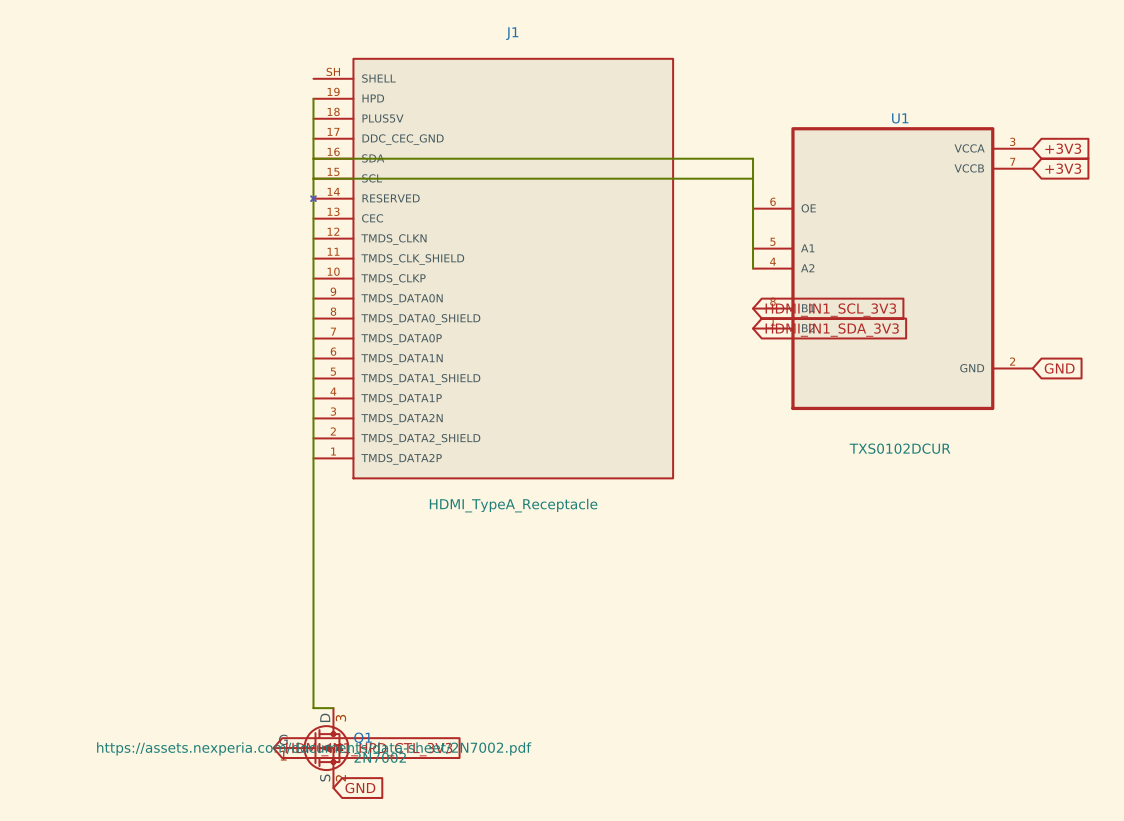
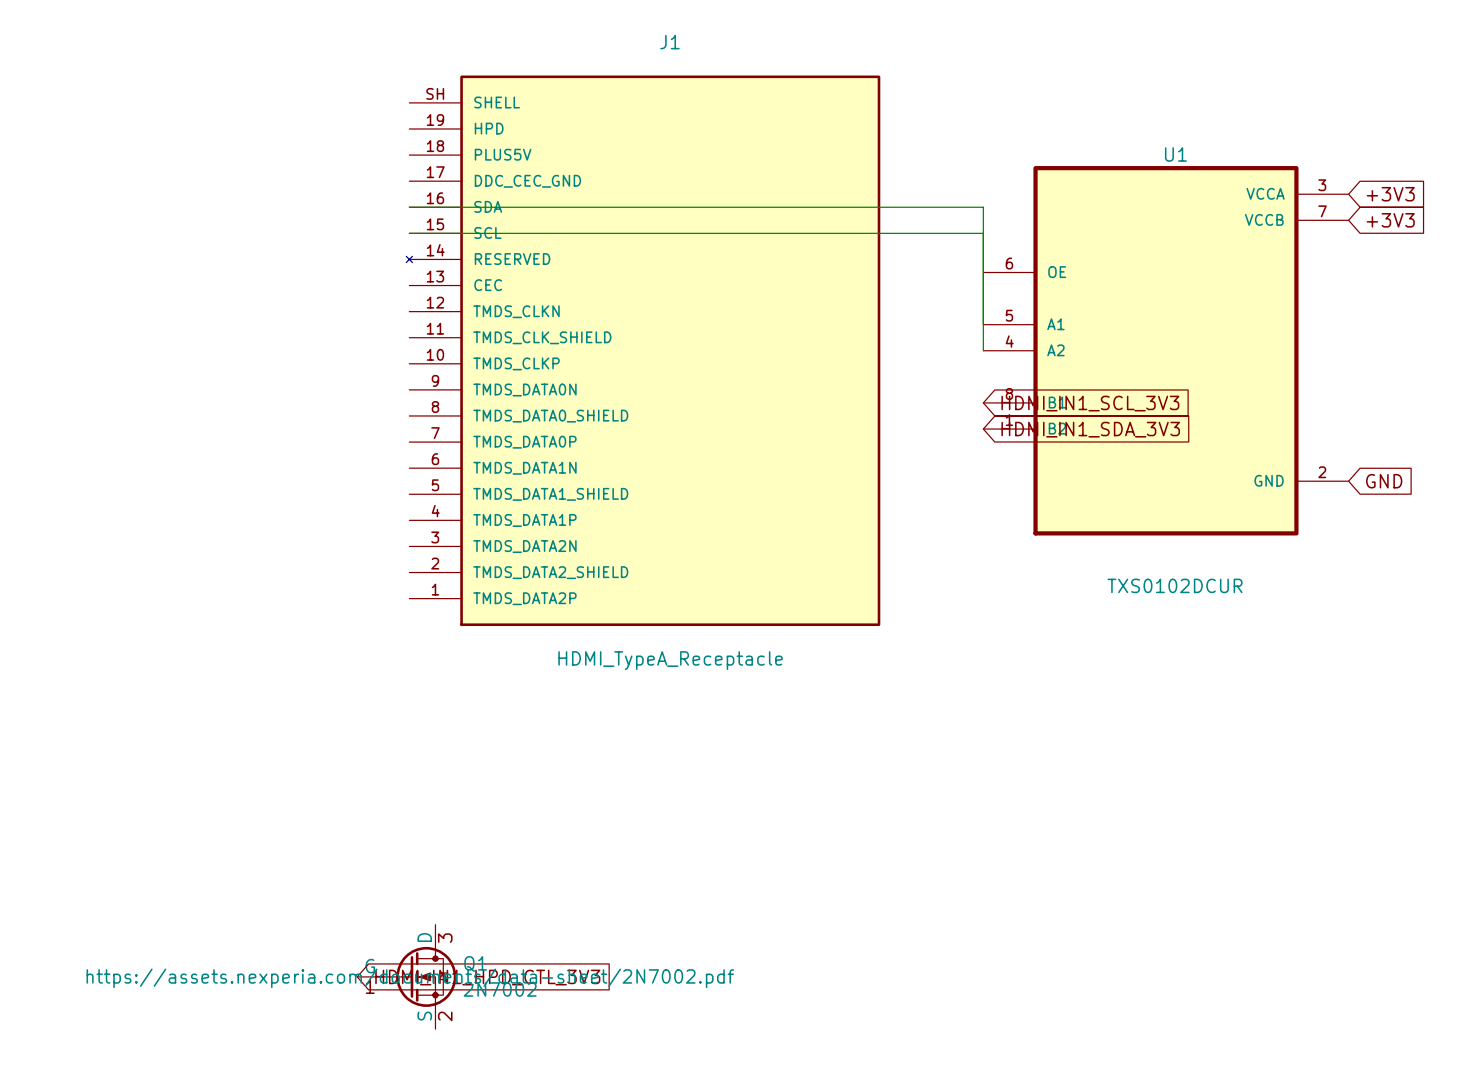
wire: (313, 98) (313, 708) (333, 708) -> none
global label: GND (360, 788) -> none

